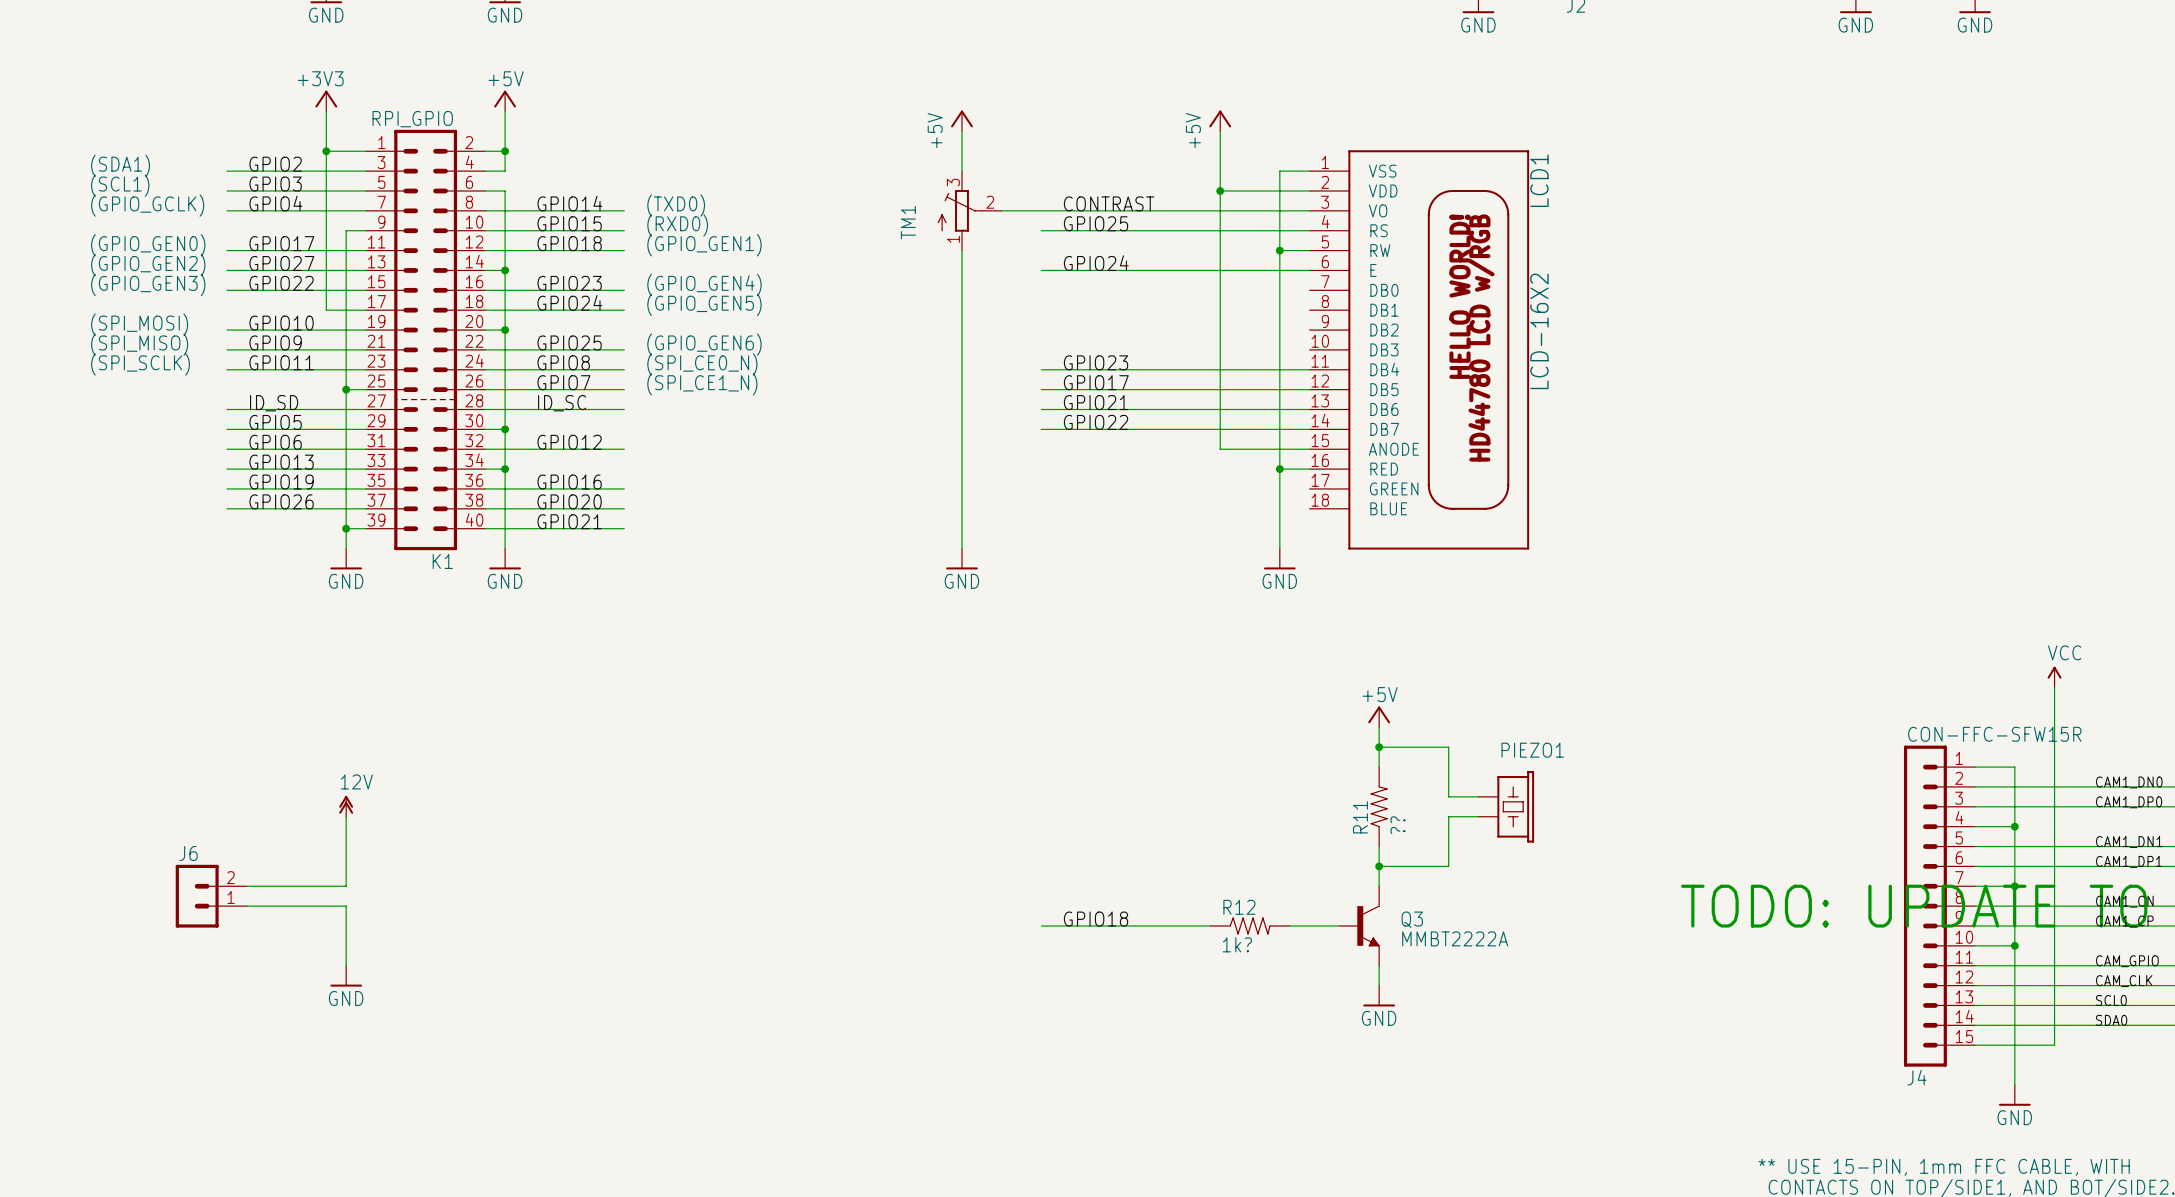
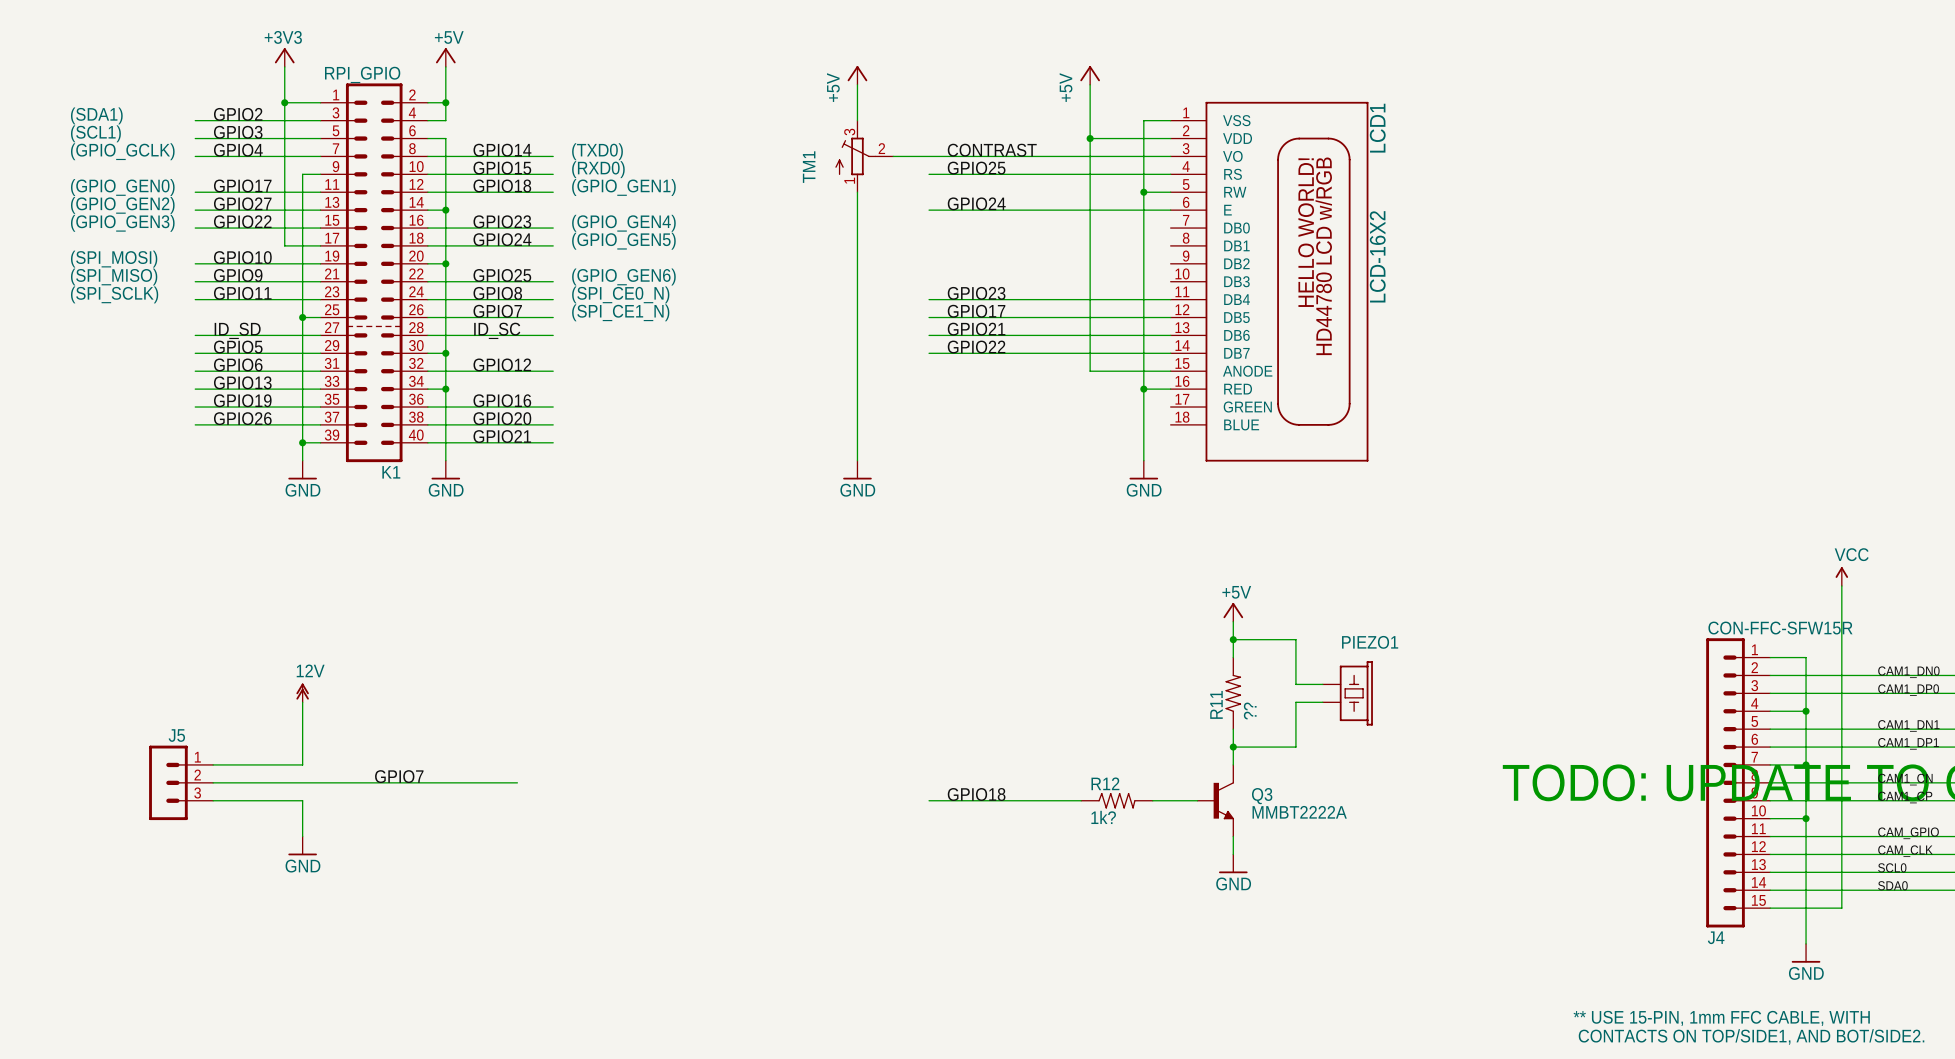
J6: (211, 896) -> none
label: none -> GPIO7 (399, 776)
J5: none -> (181, 782)
wire: (346, 906) (346, 925) -> (213, 800) (302, 800)
wire: none -> (302, 782) (517, 782)

